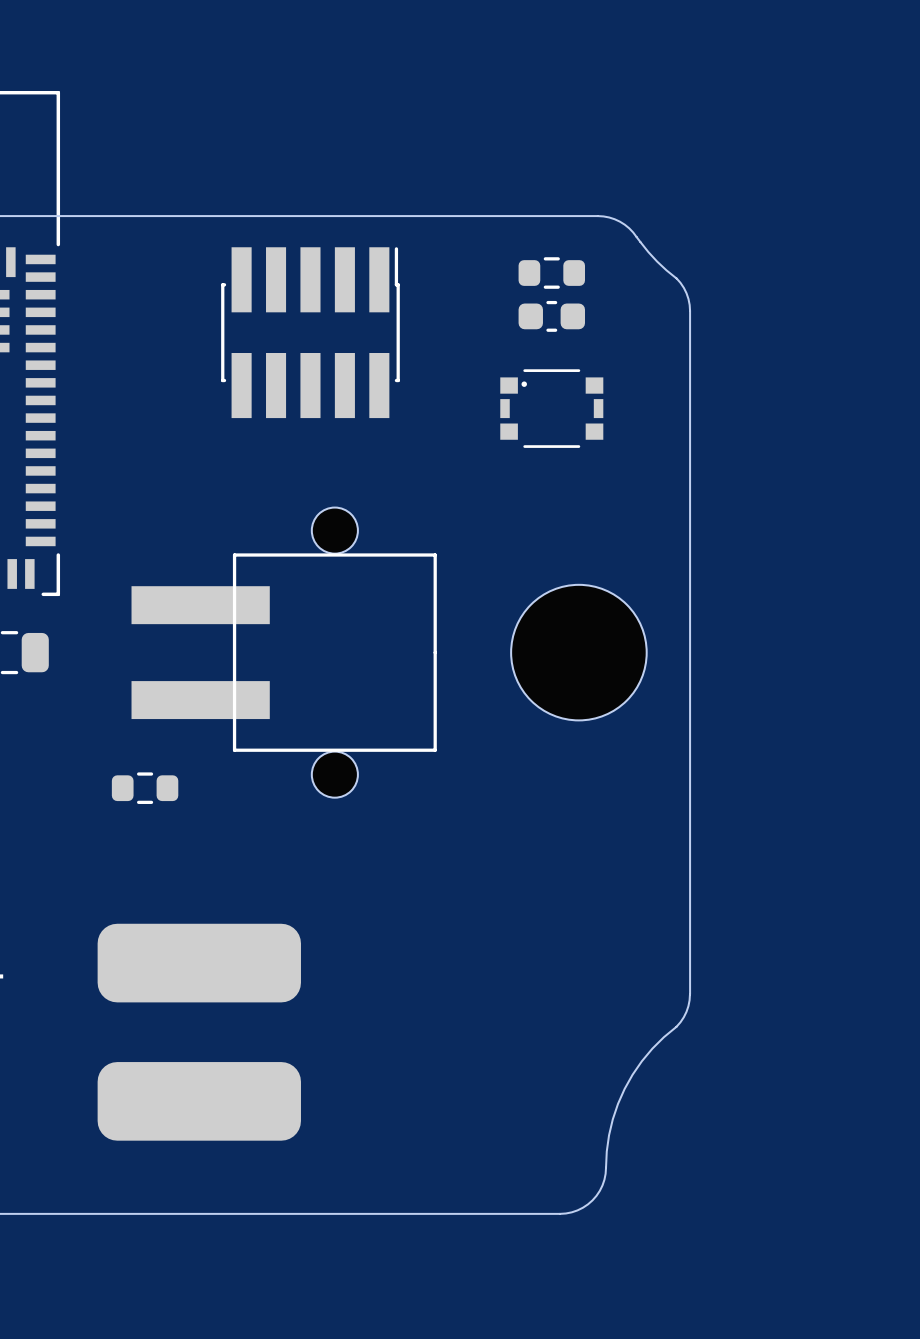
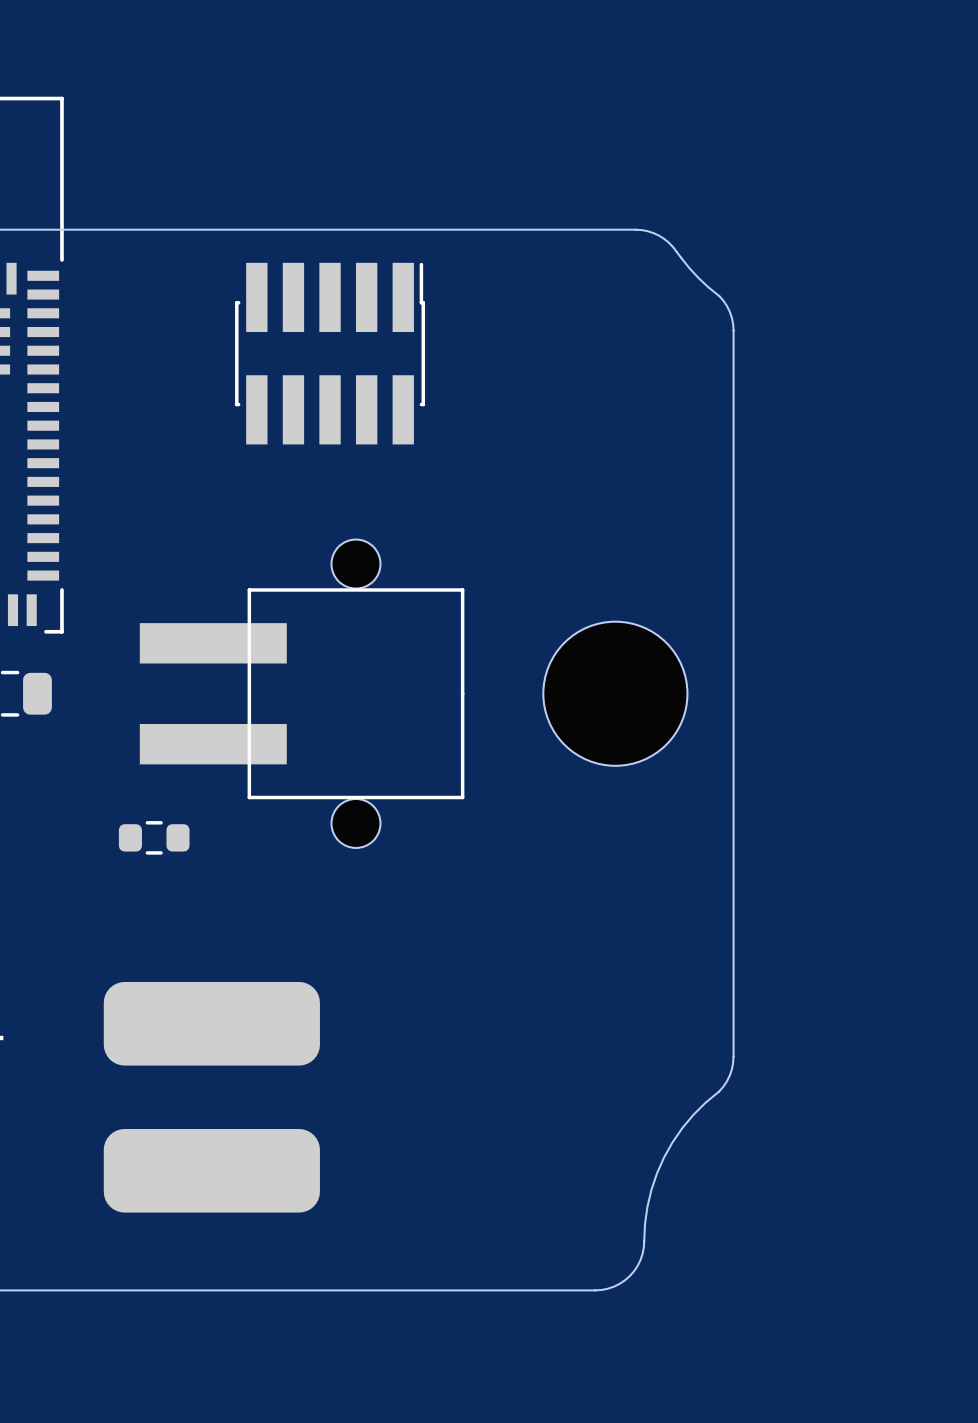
part: (551, 273) -> none
part: (551, 316) -> none
part: (551, 408) -> none

